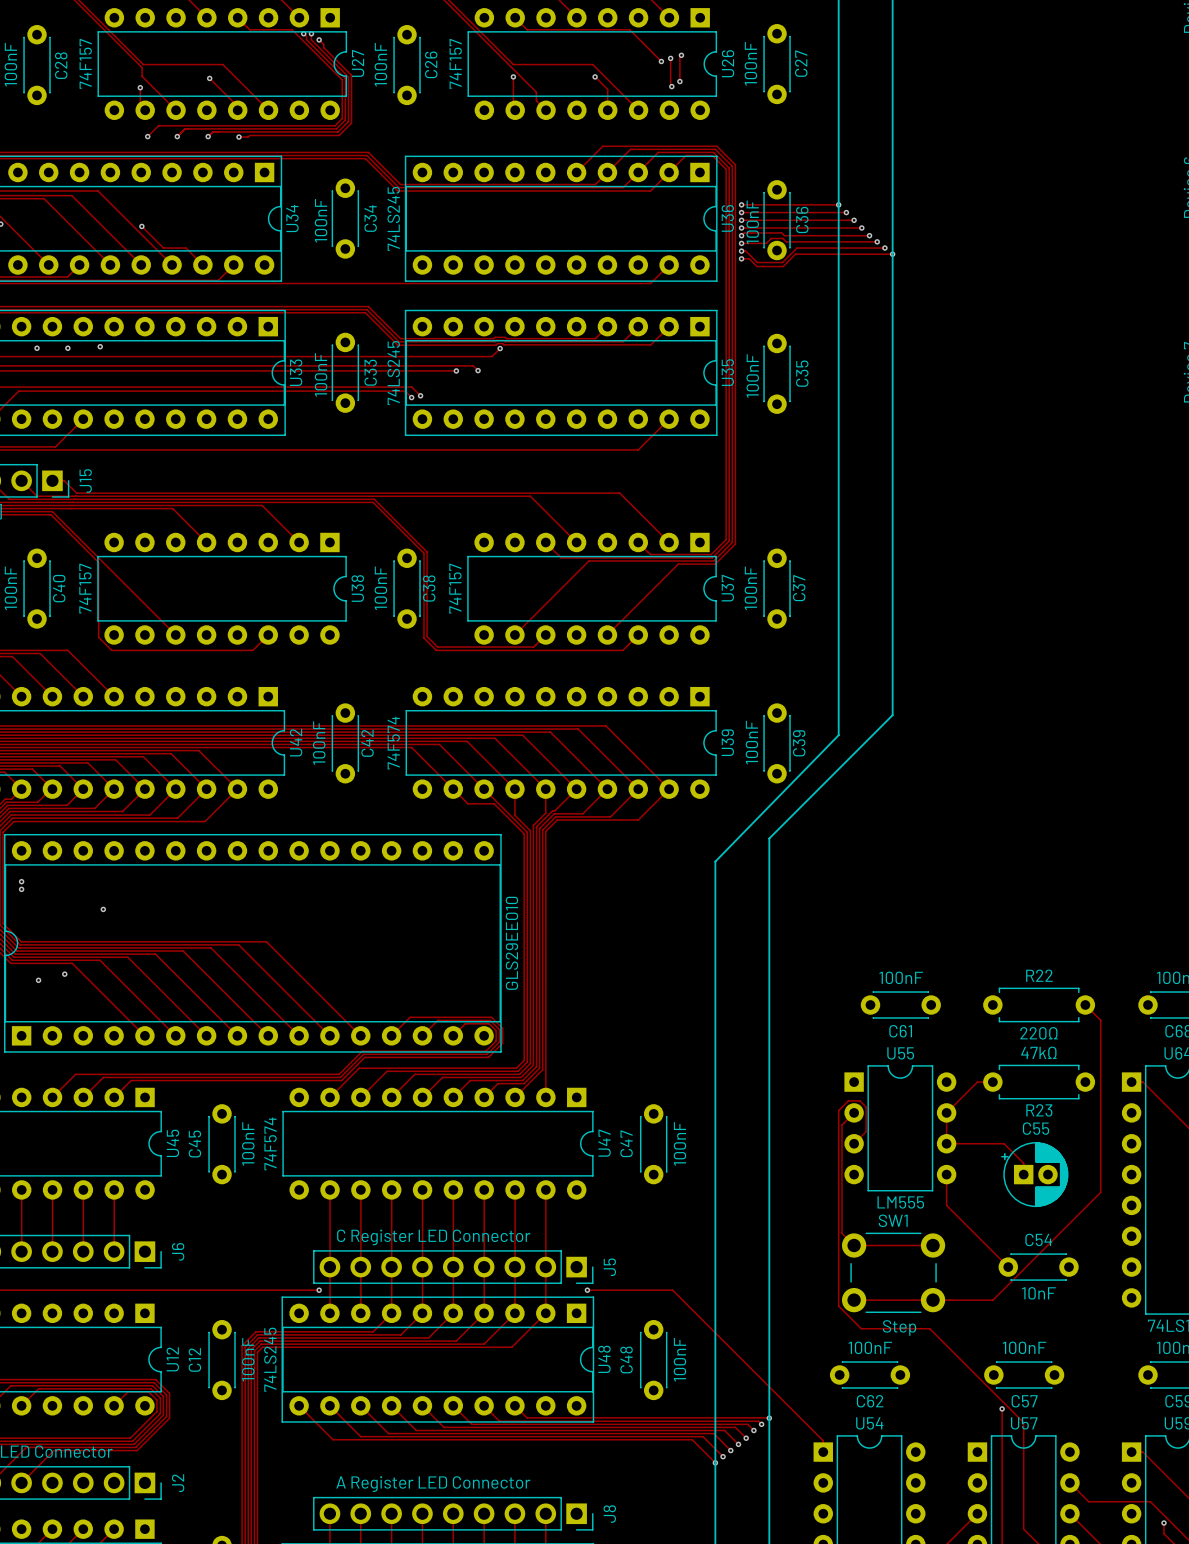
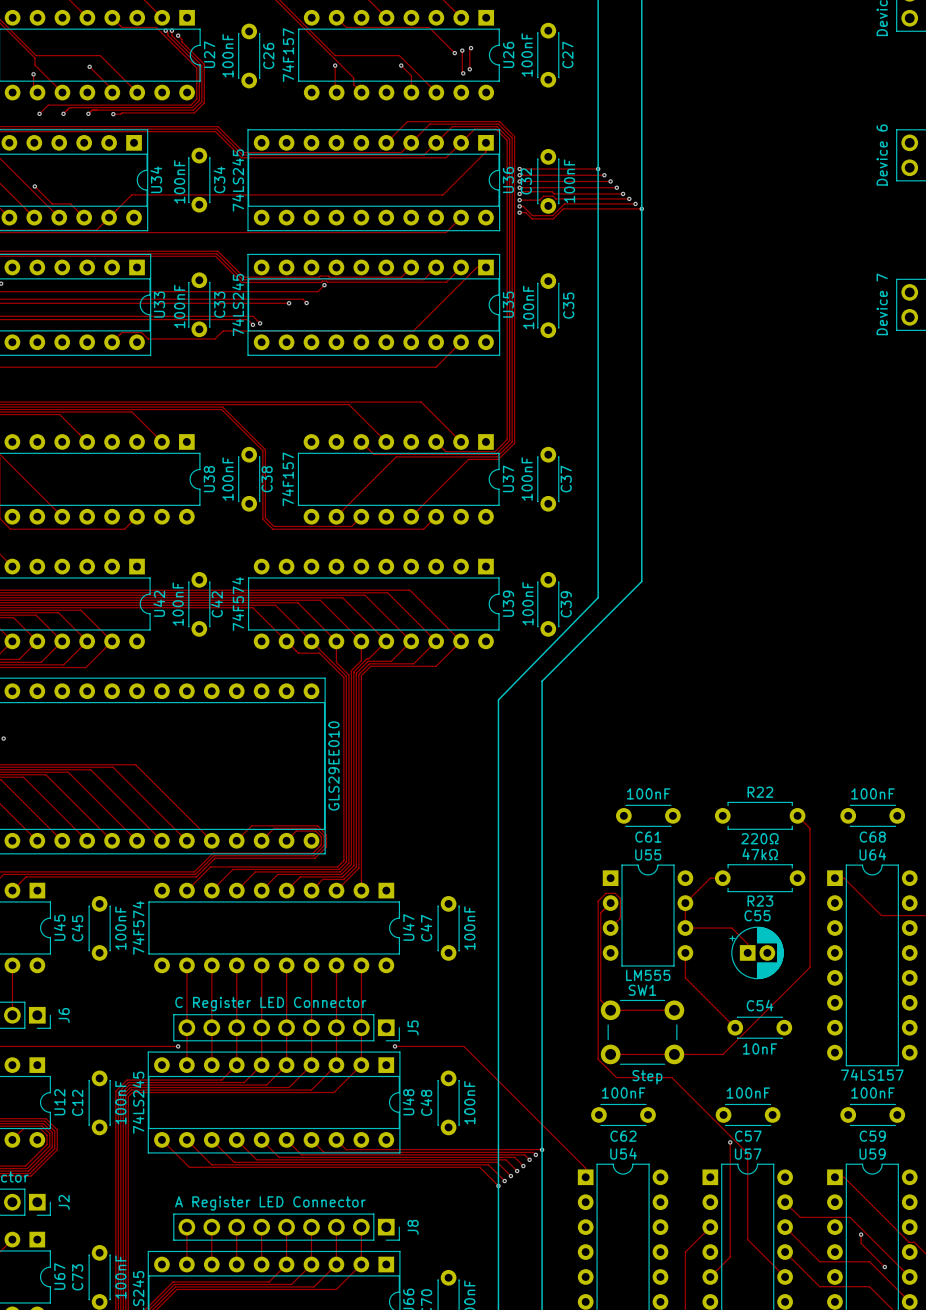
track: none -> (485, 142) (485, 151) (442, 194) (131, 194) (109, 217)
C36 name: C36 (802, 219) -> C32 (526, 181)
C36 value position: 100nF (752, 222) -> 100nF (569, 181)
track: none -> (485, 267) (476, 267) (413, 331) (223, 331) (215, 339) (148, 339) (141, 332) (121, 332) (112, 342)

